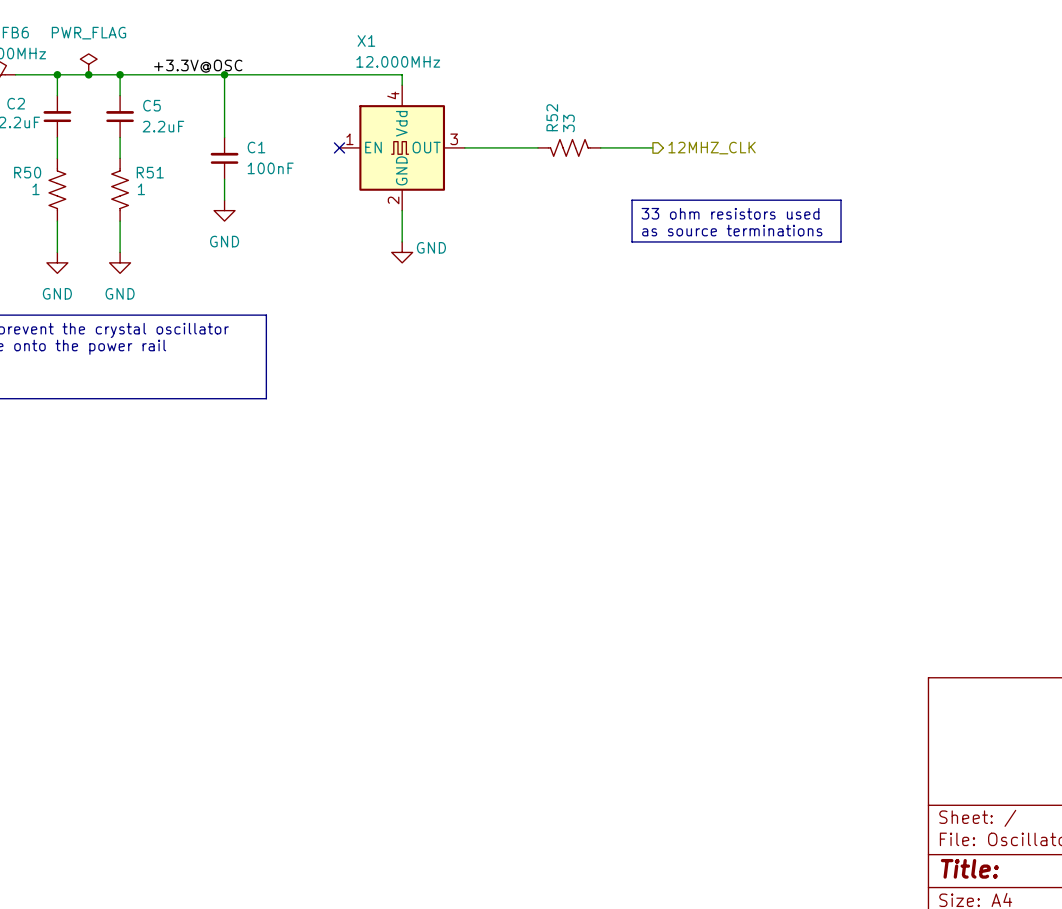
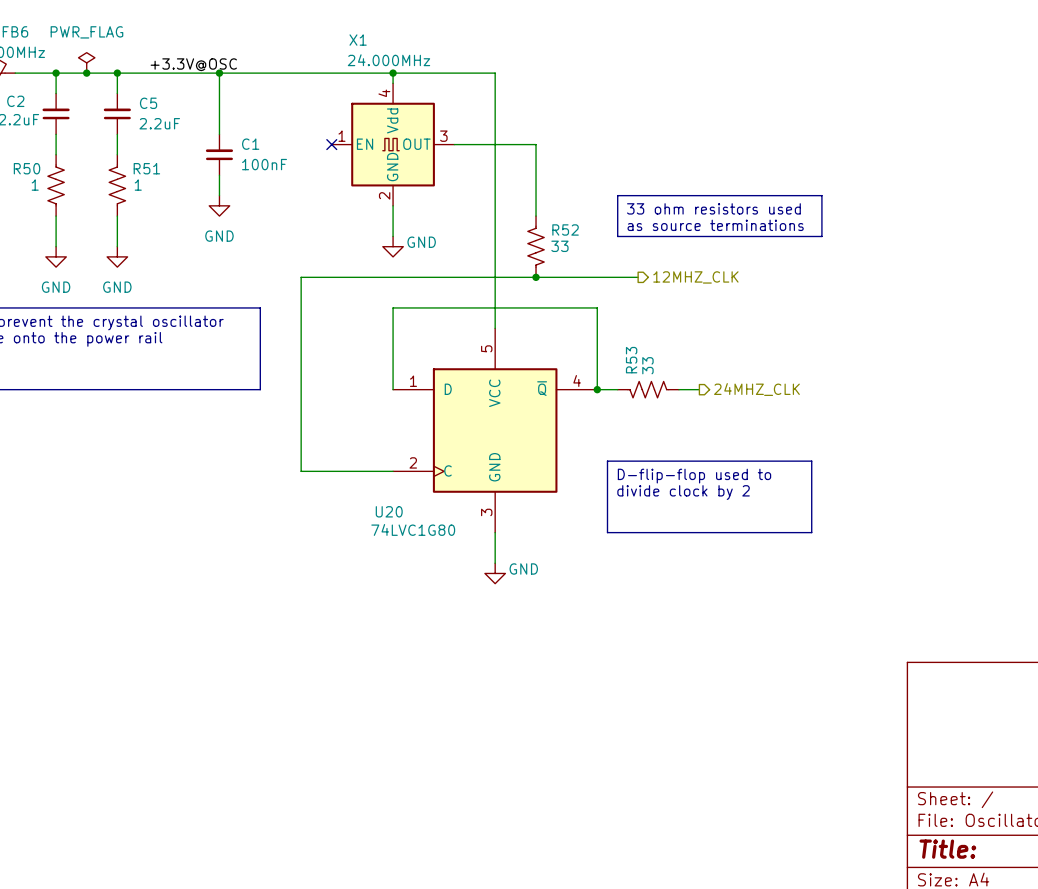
X1 value: 12.000MHz (398, 61) -> 24.000MHz (388, 60)
wire: none -> (393, 73) (495, 73) (495, 328)
junction: none -> (393, 73)
wire: none -> (525, 144) (536, 144) (536, 216)
R52 rotation: 0° (569, 147) -> 90° clockwise (536, 246)
R52 position: (569, 147) -> (536, 246)
wire: (600, 147) (652, 147) -> none
hierarchical label position: 12MHZ_CLK (712, 148) -> 12MHZ_CLK (695, 277)
junction: none -> (536, 277)
wire: none -> (638, 277) (301, 277) (301, 471) (393, 471)
wire: none -> (393, 389) (393, 307) (597, 307) (597, 389) (617, 389)
junction: none -> (597, 389)
R53: none -> 33 (648, 389)
wire: none -> (678, 389) (699, 389)
hierarchical label: none -> 24MHZ_CLK (756, 389)
U20: none -> 74LVC1G80 (495, 430)
line: none -> (607, 461) (811, 461) (811, 532) (607, 532) (607, 461)
text: none -> D-flip-flop used to (694, 476)
text: none -> divide clock by 2 (683, 492)
wire: none -> (495, 532) (495, 563)
power symbol: none -> GND (495, 573)

